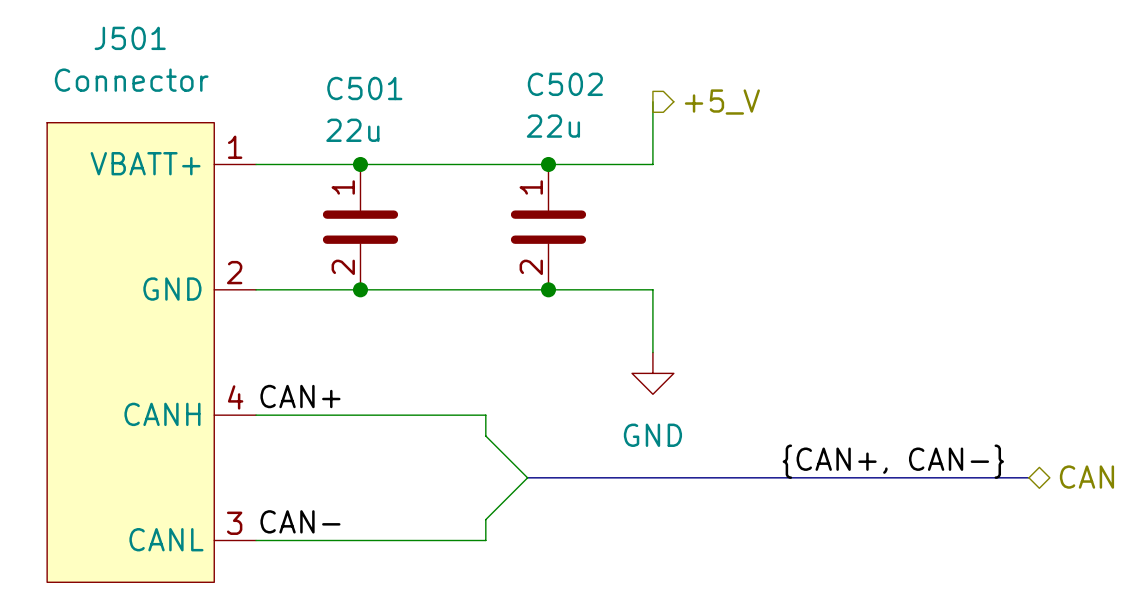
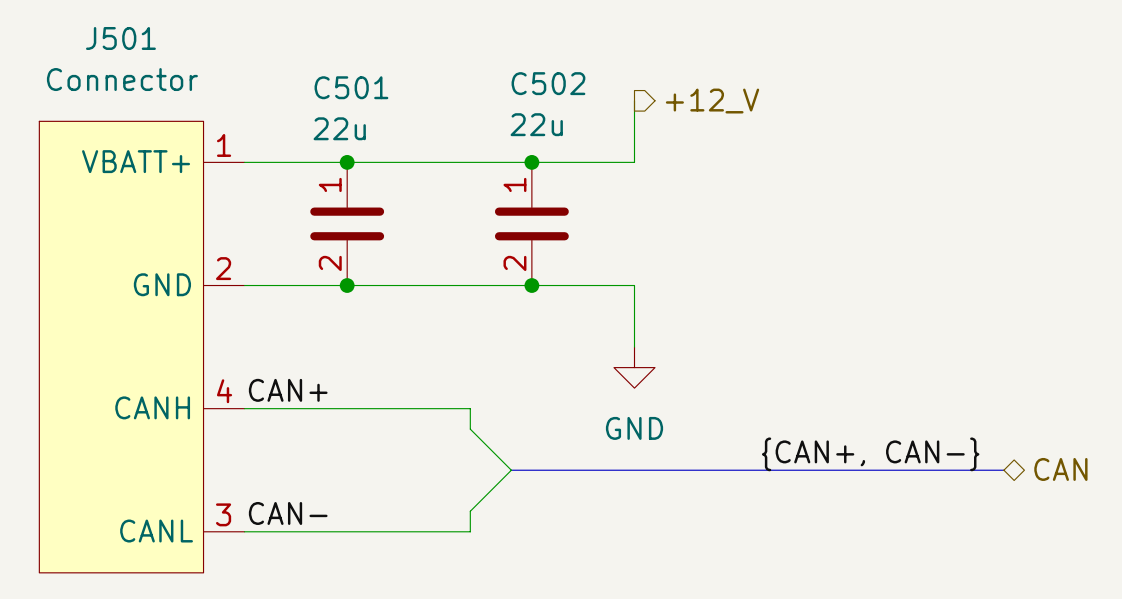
hierarchical label: +5_V (722, 102) -> +12_V (712, 101)

